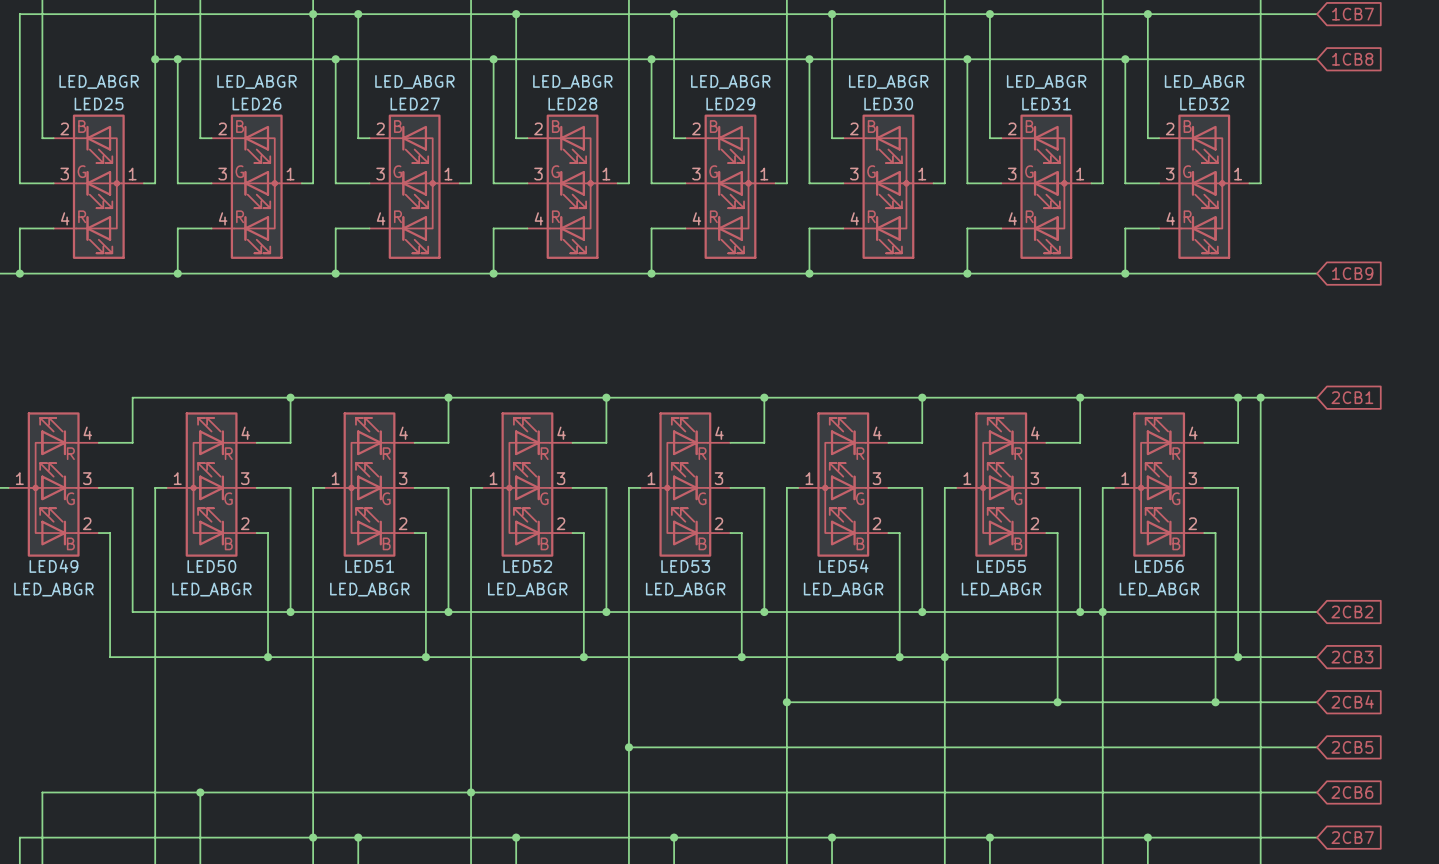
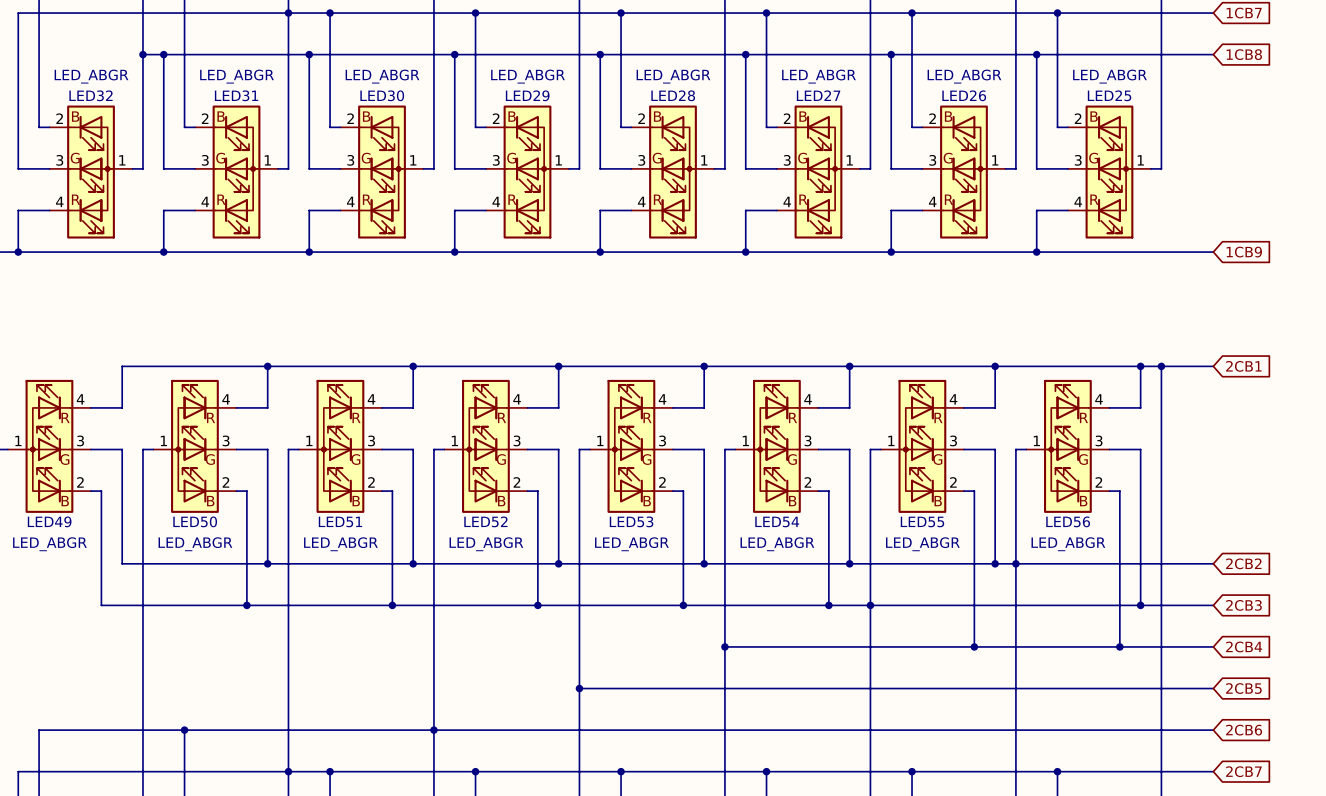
LED25 name: LED25 (99, 103) -> LED32 (91, 95)
LED26 name: LED26 (256, 103) -> LED31 (236, 95)
LED27 name: LED27 (415, 103) -> LED30 (382, 95)
LED28 name: LED28 (572, 103) -> LED29 (527, 95)
LED29 name: LED29 (730, 103) -> LED28 (673, 95)
LED30 name: LED30 (888, 103) -> LED27 (818, 95)
LED31 name: LED31 (1046, 103) -> LED26 (964, 95)
LED32 name: LED32 (1204, 103) -> LED25 (1109, 95)

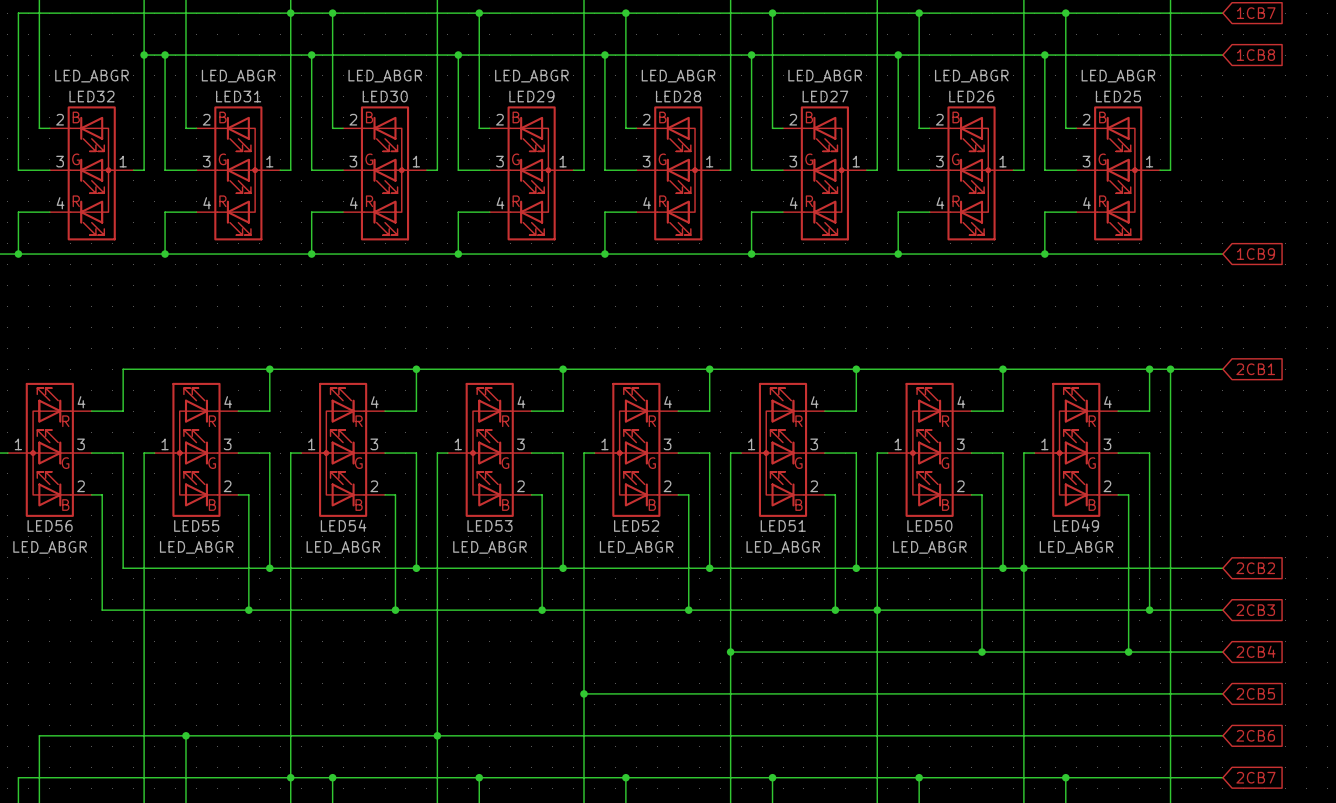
LED49 name: LED49 (49, 521) -> LED56 (50, 525)
LED50 name: LED50 (195, 521) -> LED55 (196, 525)
LED51 name: LED51 (340, 521) -> LED54 (343, 525)
LED52 name: LED52 (485, 521) -> LED53 (489, 525)
LED53 name: LED53 (631, 521) -> LED52 (636, 525)
LED54 name: LED54 (777, 521) -> LED51 (783, 525)
LED55 name: LED55 (922, 521) -> LED50 (929, 525)
LED56 name: LED56 (1068, 521) -> LED49 (1076, 525)

